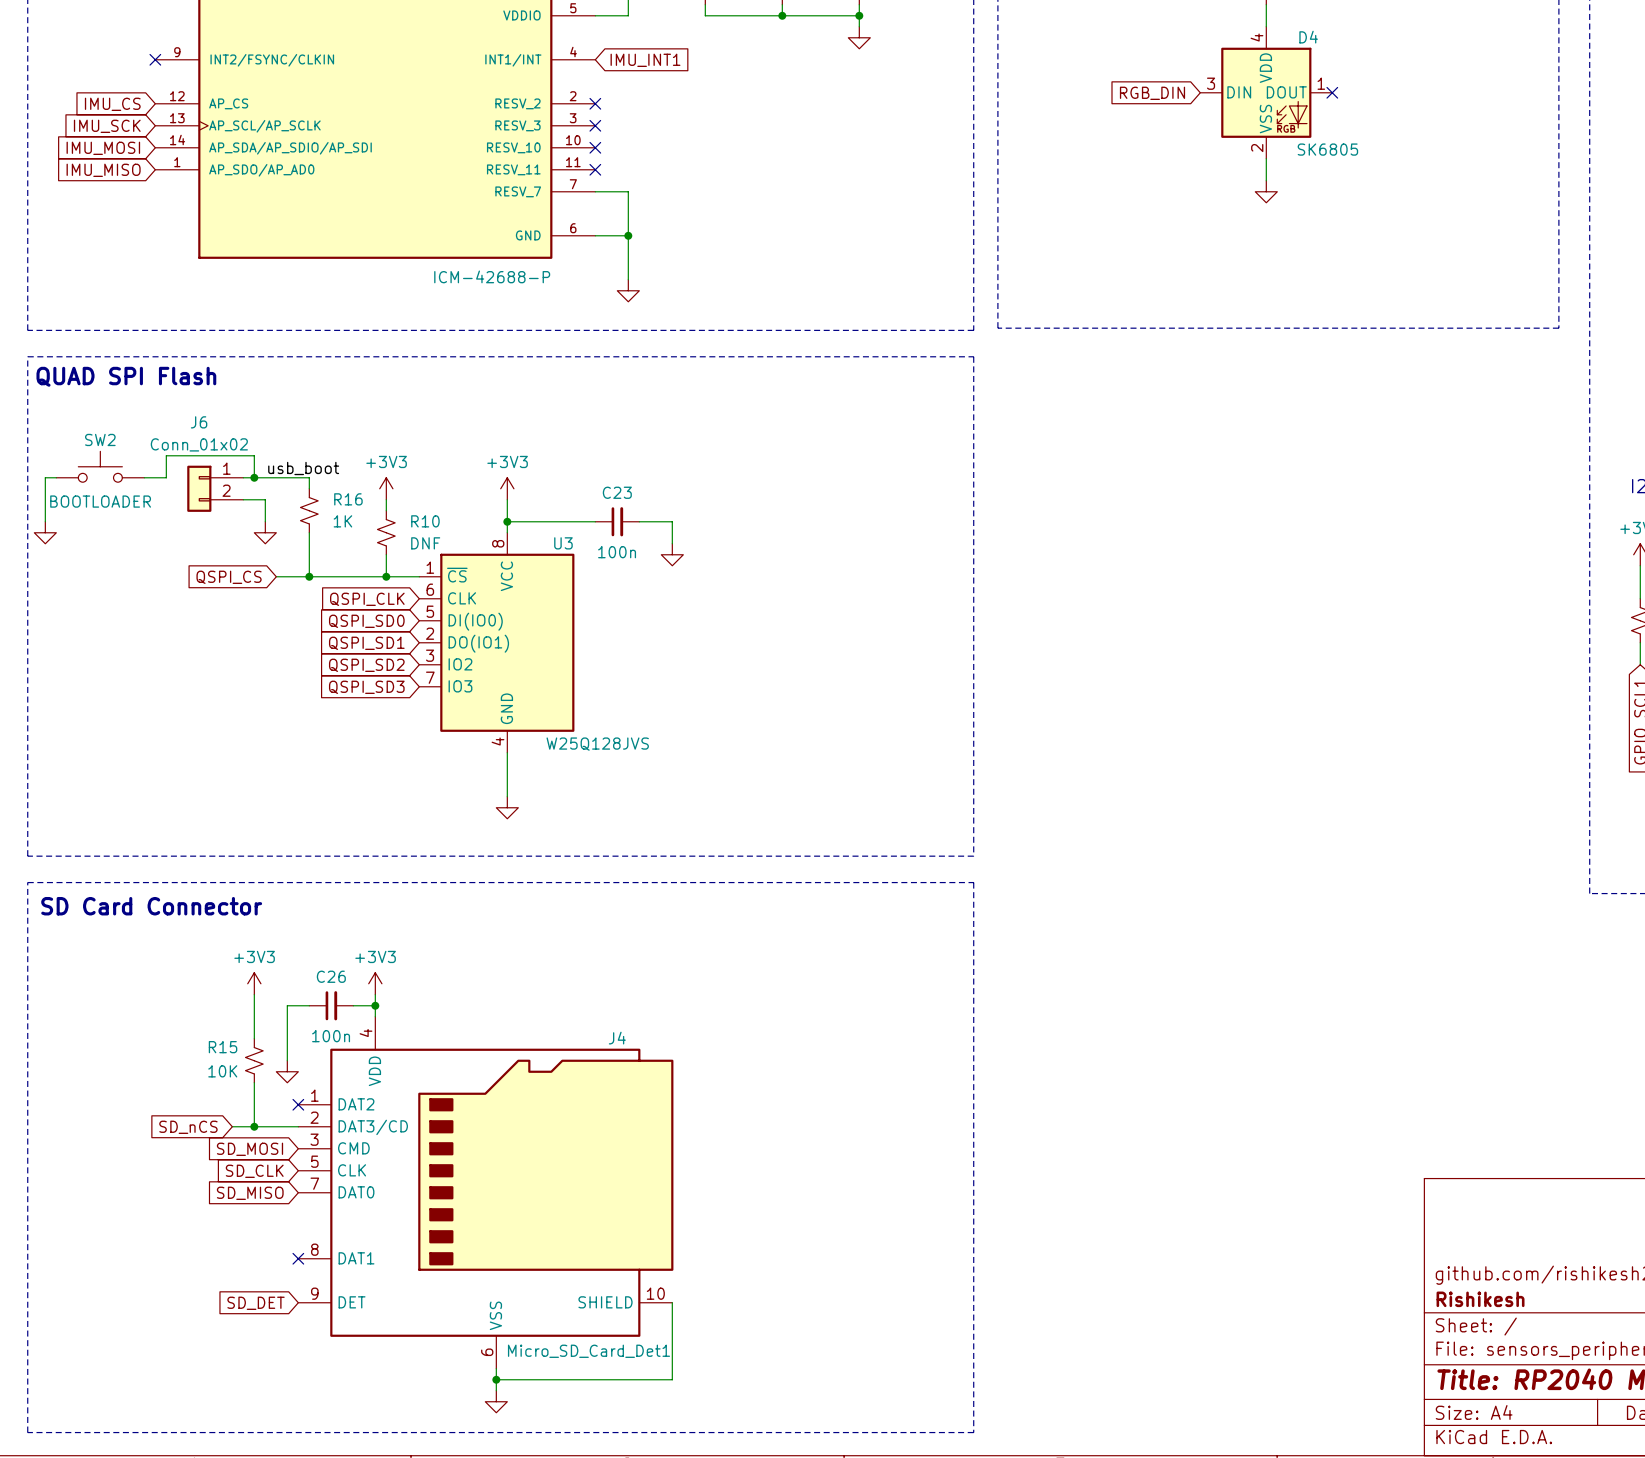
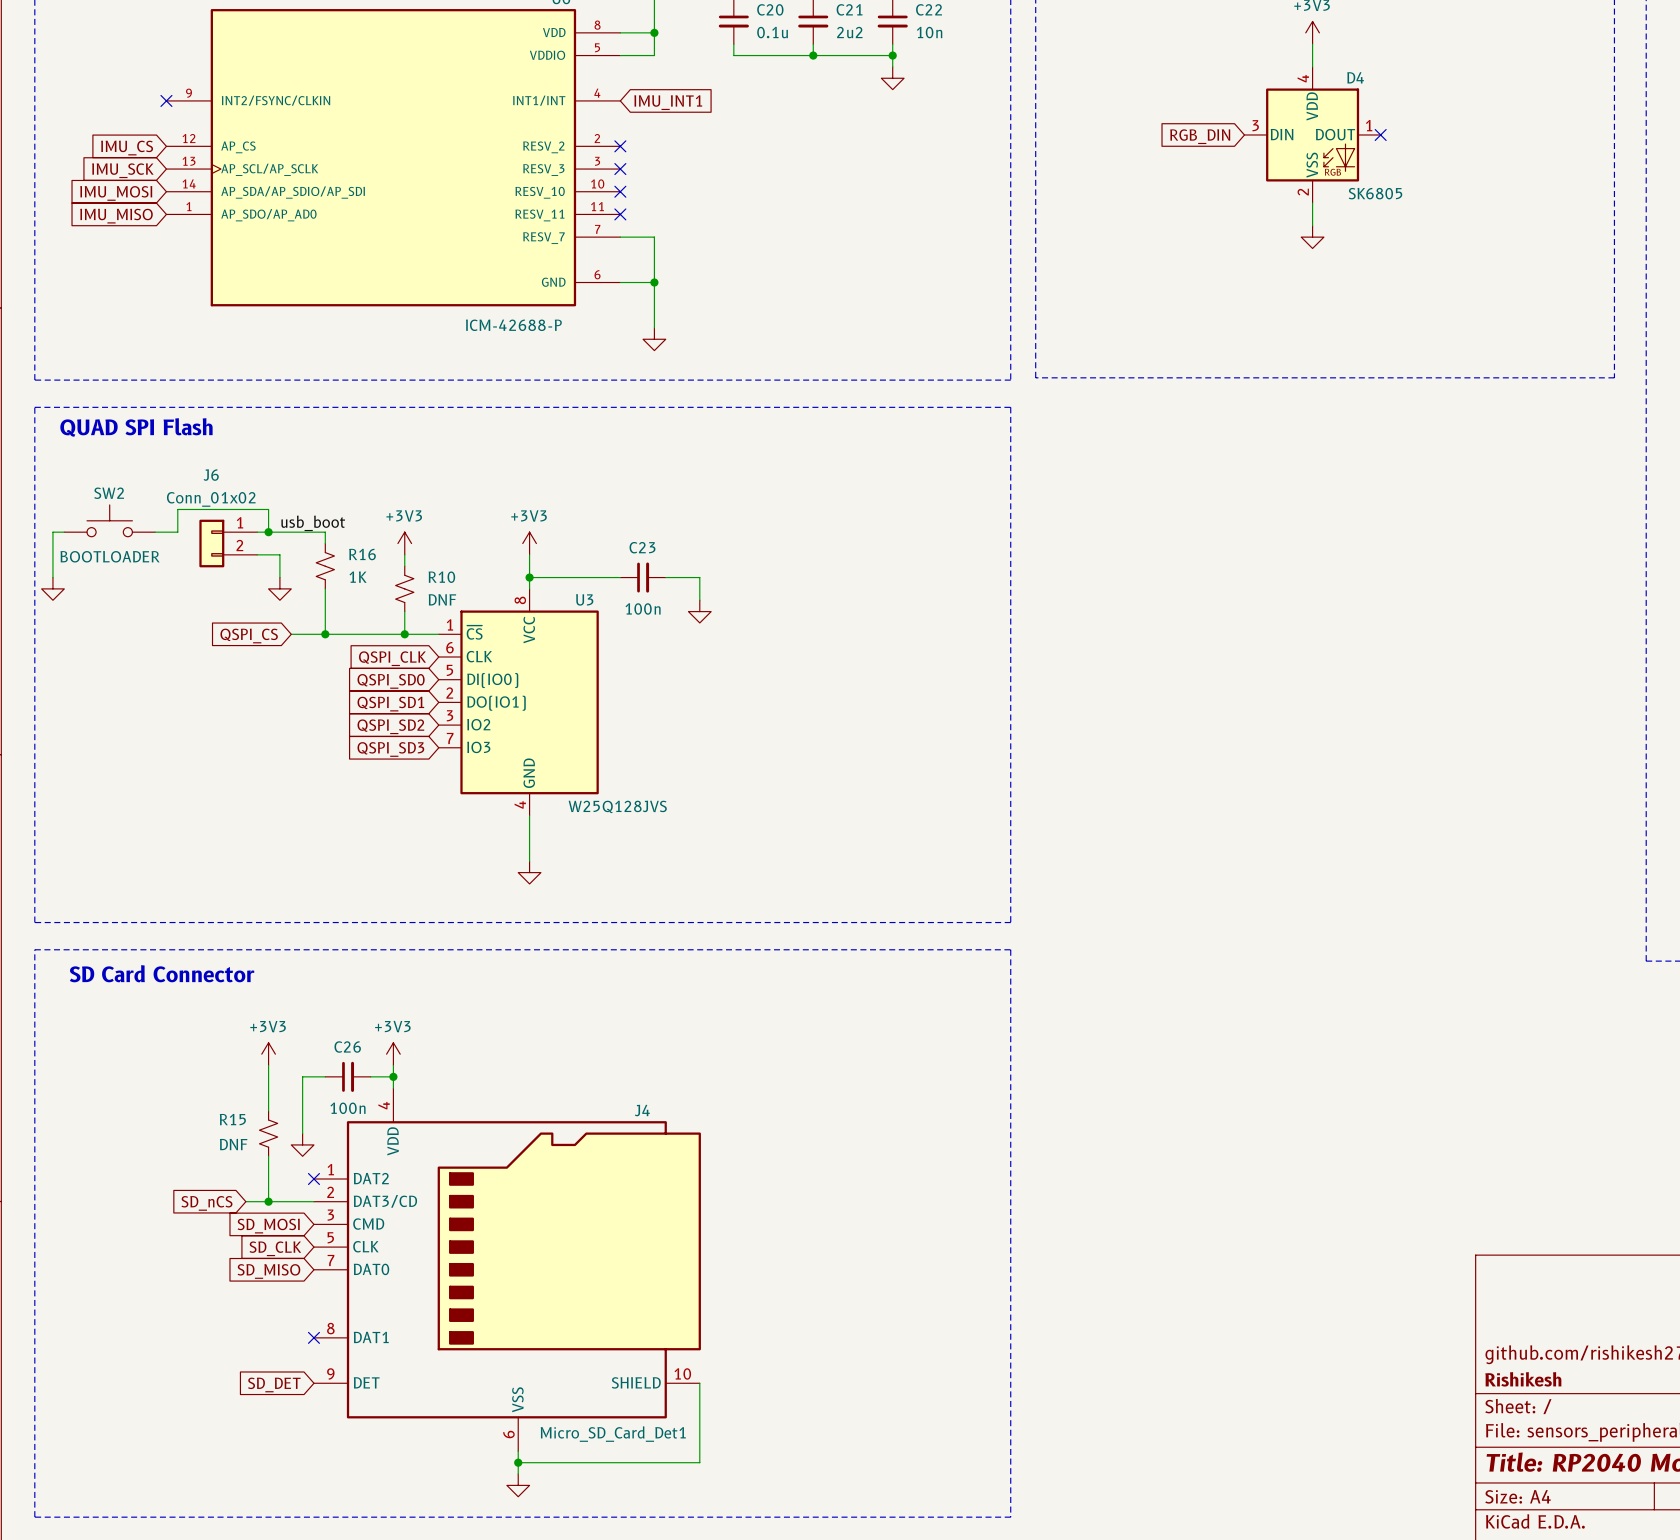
R15 value: 10K (222, 1071) -> DNF (233, 1144)

